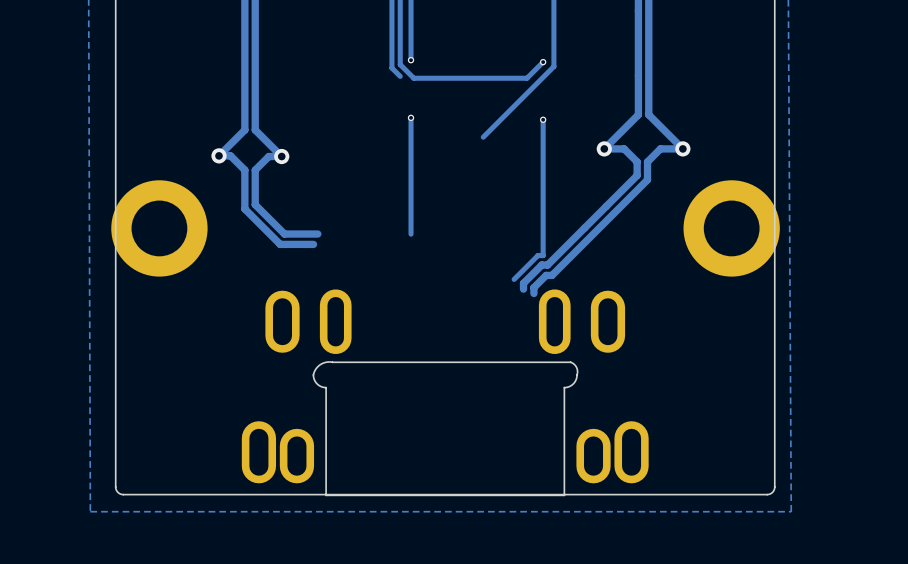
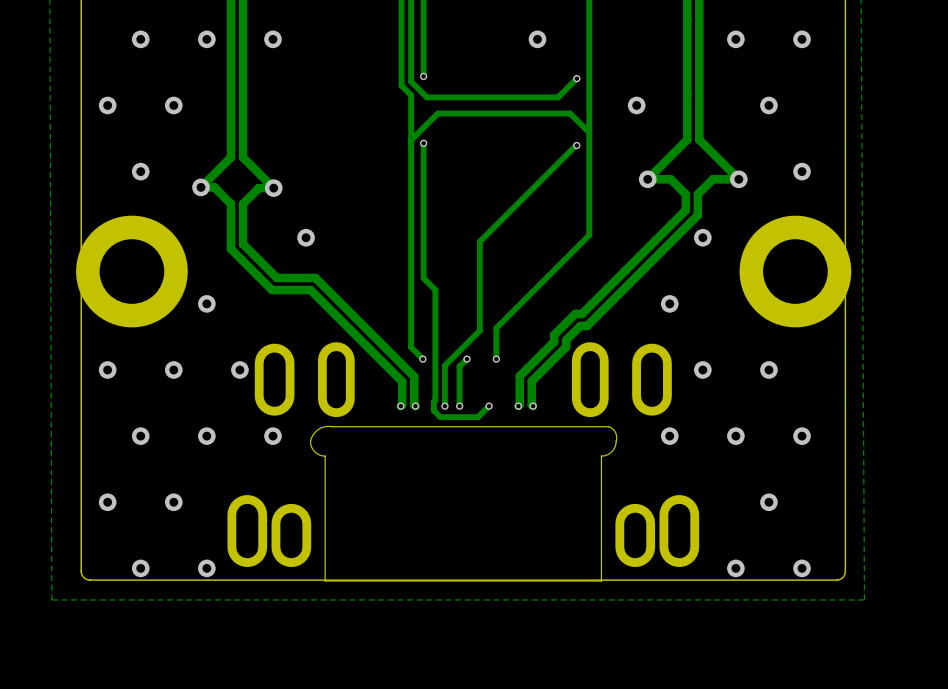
via: none -> (140, 39)
via: none -> (206, 39)
via: none -> (272, 39)
via: none -> (537, 39)
via: none -> (735, 39)
via: none -> (802, 39)
track: (553, 66) (483, 137) -> (589, 83) (589, 235) (496, 328) (496, 359)
track: none -> (411, 95) (411, 347) (422, 359)
via: none -> (107, 105)
via: none -> (173, 105)
via: none -> (636, 105)
via: none -> (768, 105)
track: none -> (589, 132) (570, 113) (437, 113) (411, 140)
track: (543, 119) (543, 255) (537, 255) (514, 279) -> (576, 145) (479, 241) (479, 330) (444, 365) (444, 406)
via: none -> (140, 171)
via: none -> (802, 171)
via: none -> (306, 237)
via: none -> (702, 237)
track: none -> (315, 278) (414, 376) (415, 406)
track: none -> (423, 278) (435, 289) (433, 410) (440, 417) (478, 417) (489, 406)
track: none -> (310, 290) (402, 381) (400, 406)
via: none -> (206, 303)
via: none -> (669, 303)
track: none -> (554, 341) (519, 376) (518, 406)
track: none -> (566, 346) (531, 381) (533, 406)
via: none -> (422, 359)
track: none -> (466, 359) (459, 366) (459, 406)
via: none -> (466, 359)
via: none -> (496, 359)
via: none -> (107, 370)
via: none -> (173, 370)
via: none -> (239, 370)
via: none -> (702, 370)
via: none -> (768, 370)
via: none -> (400, 406)
via: none -> (415, 406)
via: none -> (444, 406)
via: none -> (459, 406)
via: none -> (489, 406)
via: none -> (518, 406)
via: none -> (533, 406)
via: none -> (140, 436)
via: none -> (206, 436)
via: none -> (272, 436)
via: none -> (669, 436)
via: none -> (735, 436)
via: none -> (802, 436)
via: none -> (107, 502)
via: none -> (173, 502)
via: none -> (768, 502)
via: none -> (140, 568)
via: none -> (206, 568)
via: none -> (735, 568)
via: none -> (802, 568)

